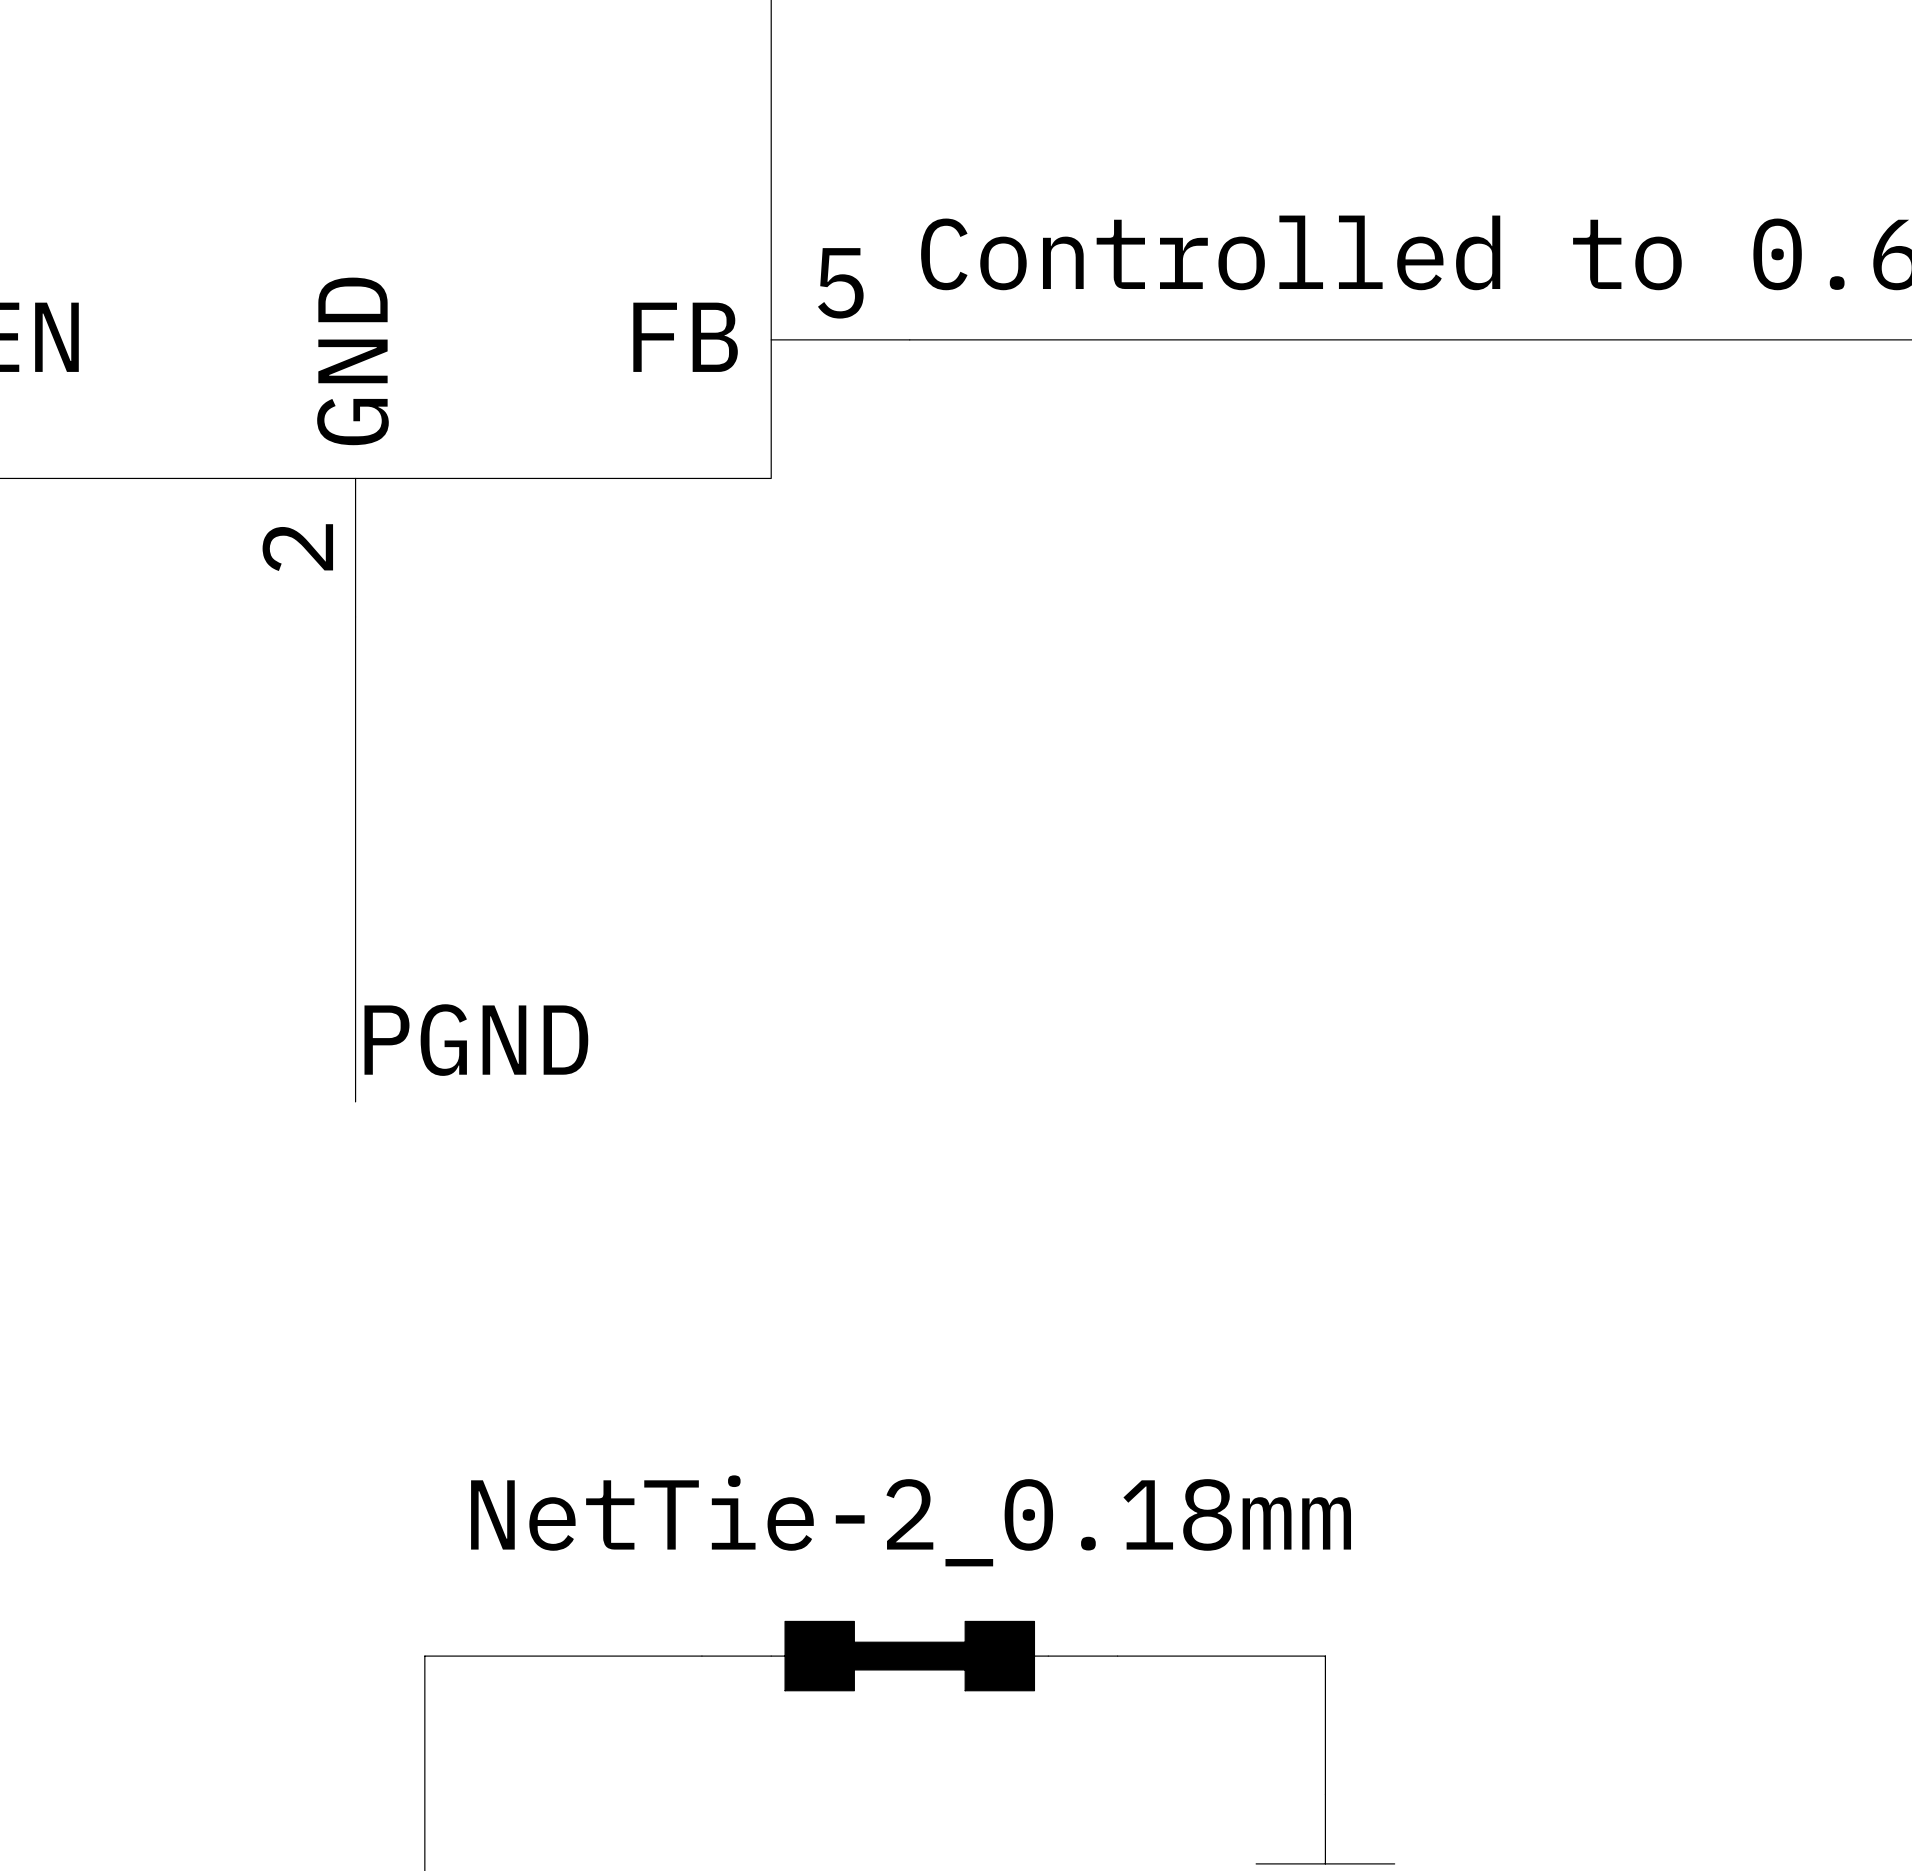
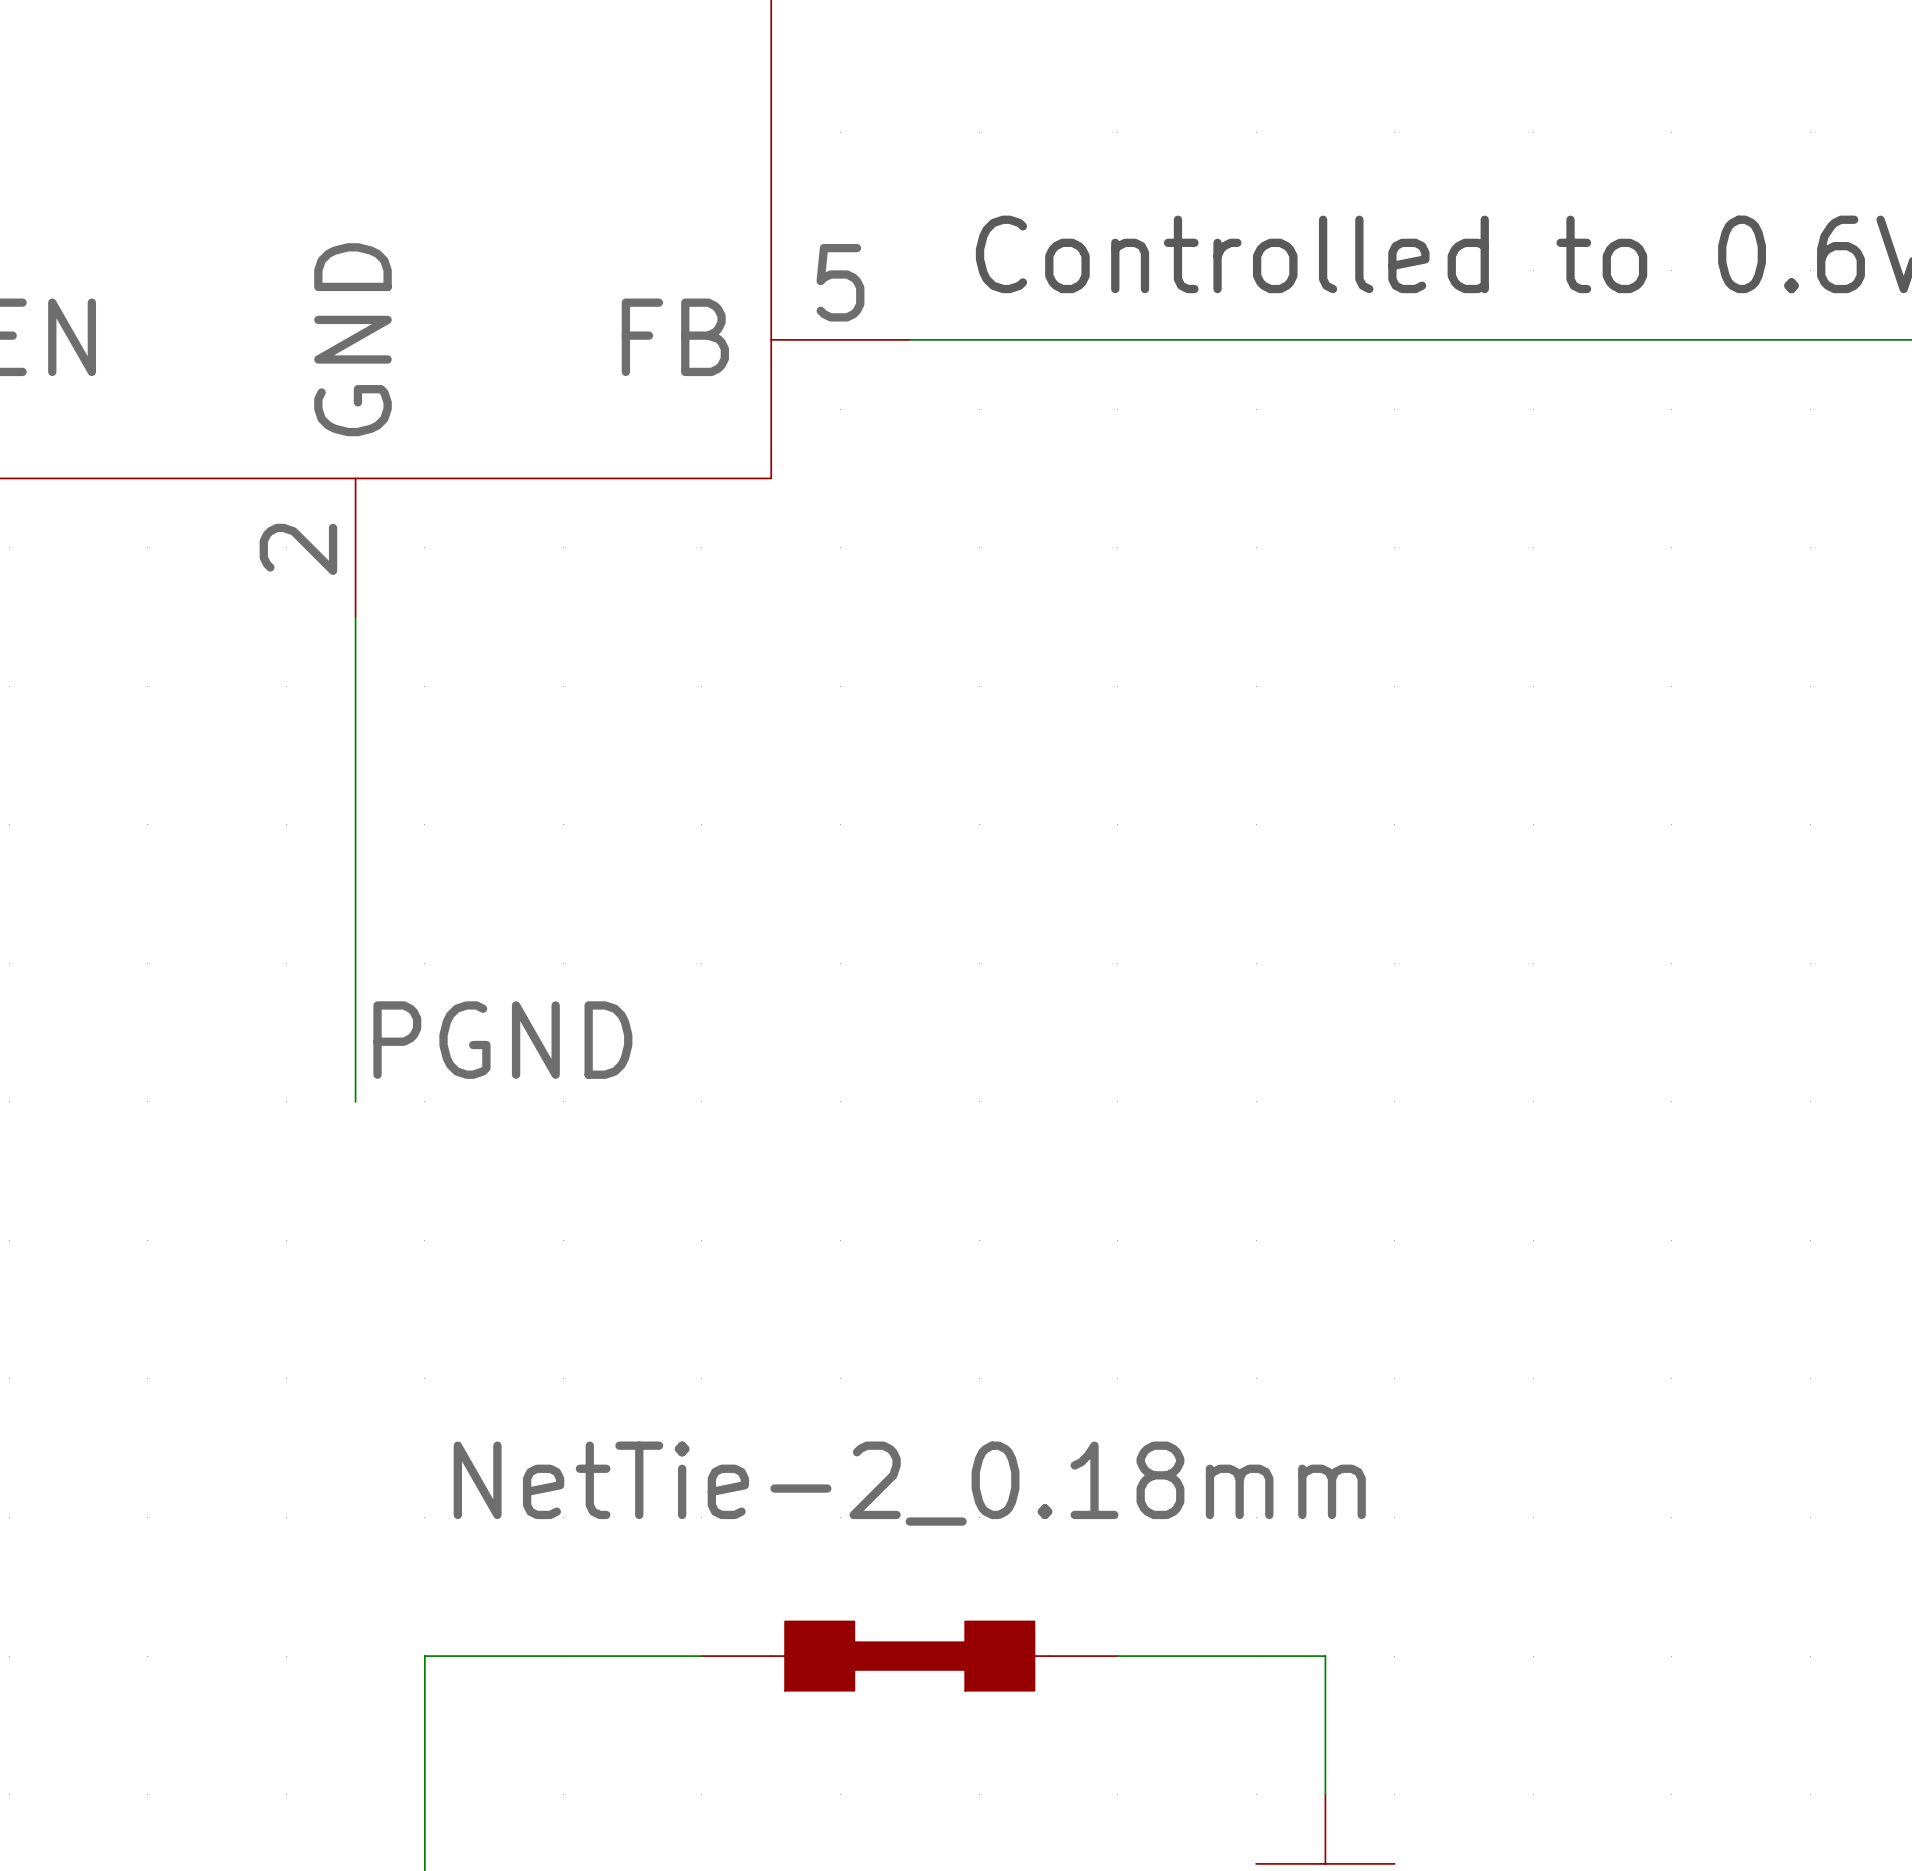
part value position: NetTie-2_0.18mm (911, 1520) -> NetTie-2_0.18mm (909, 1483)

